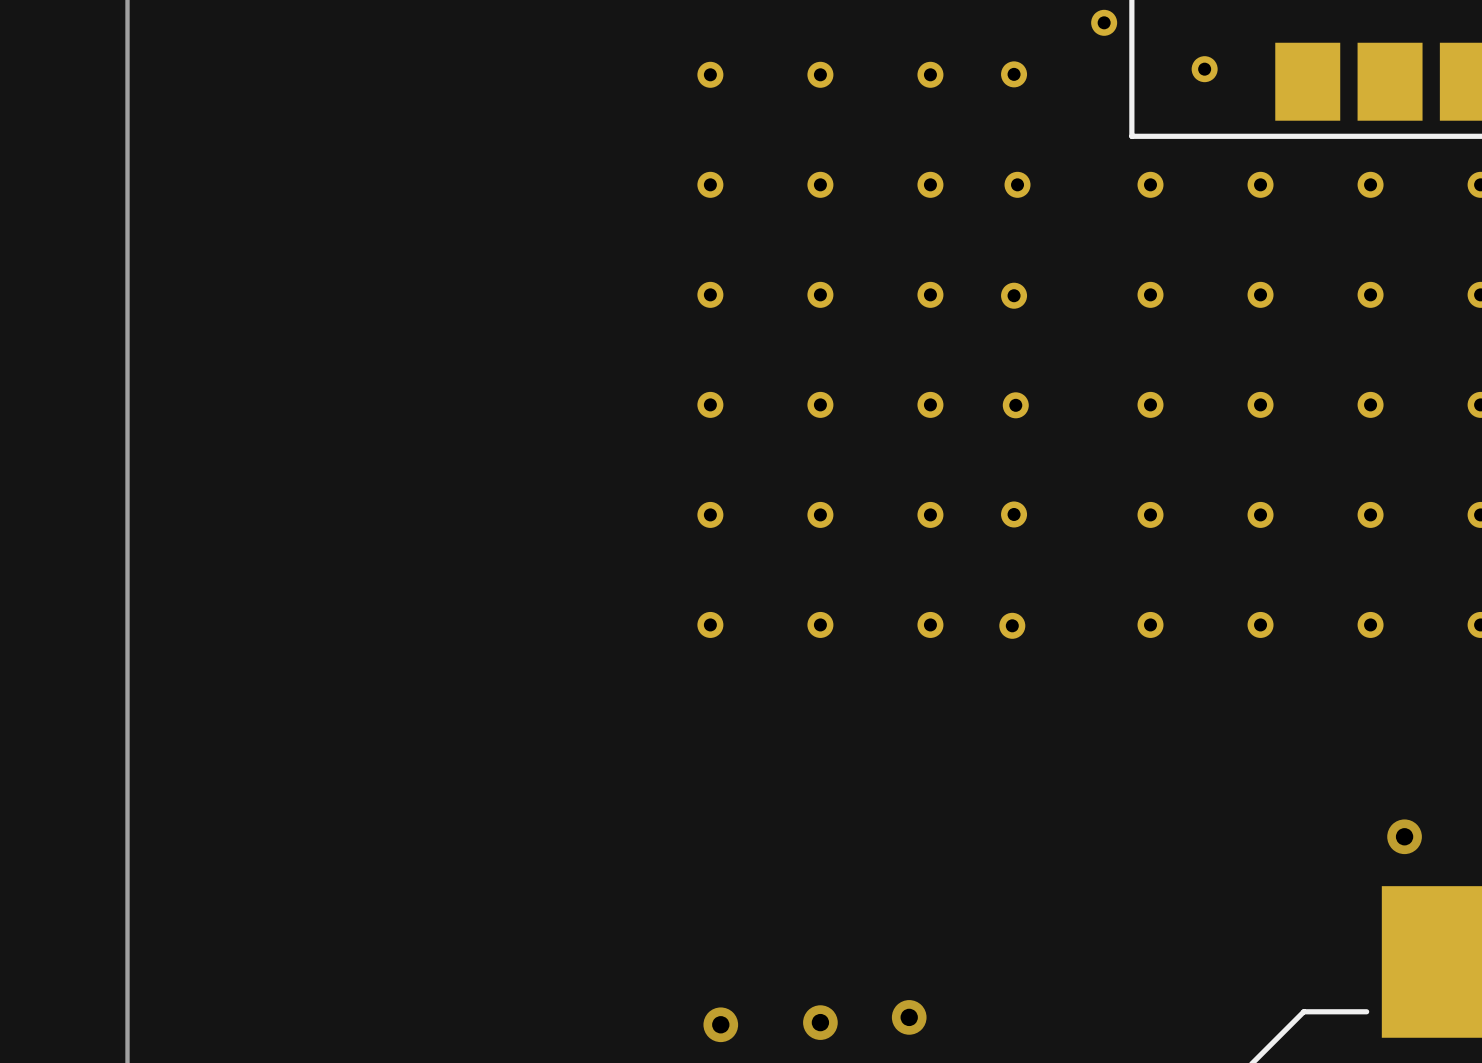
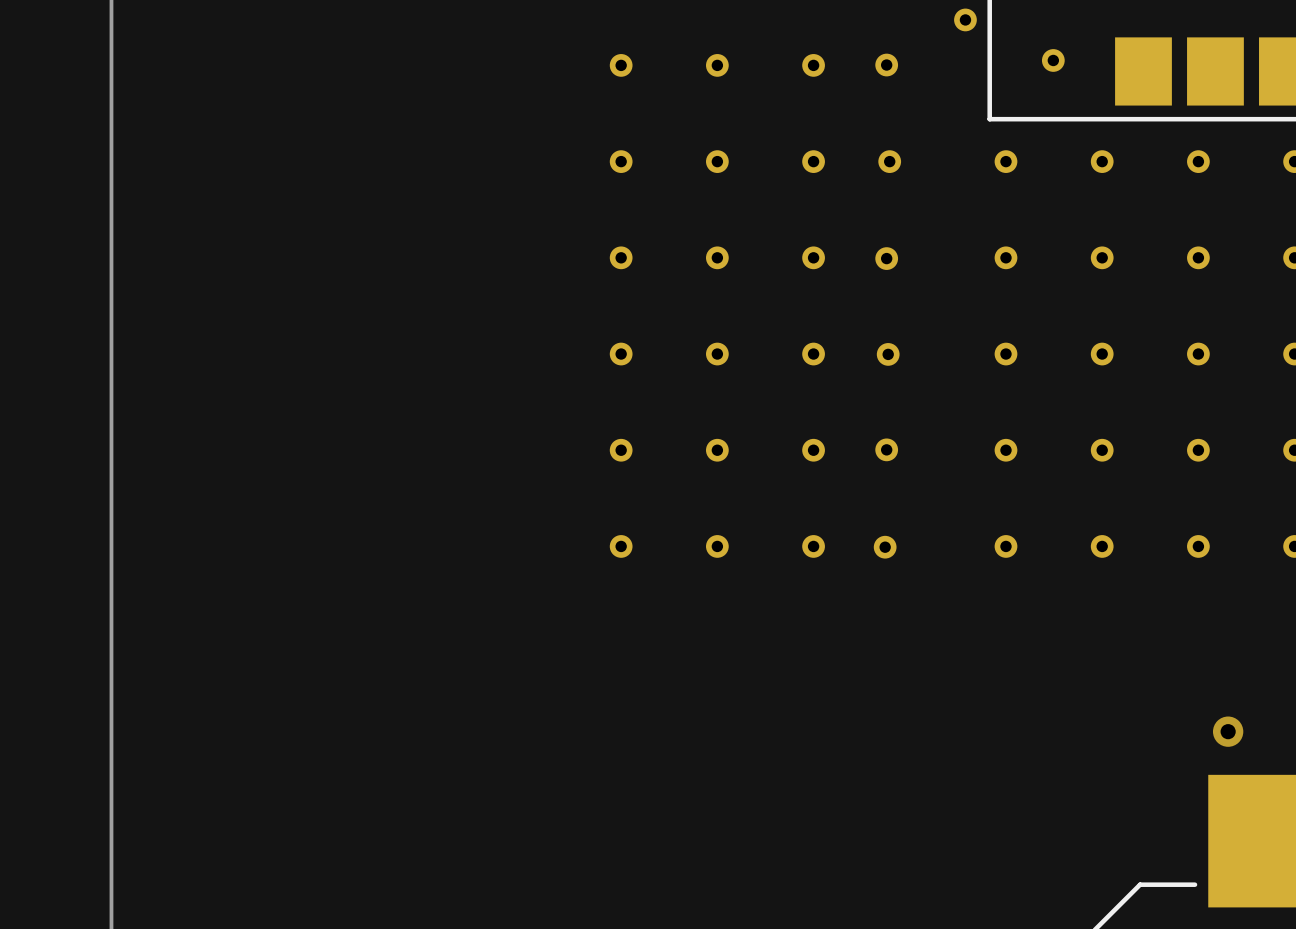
via: (909, 1017) -> none
via: (820, 1022) -> none
via: (720, 1024) -> none

